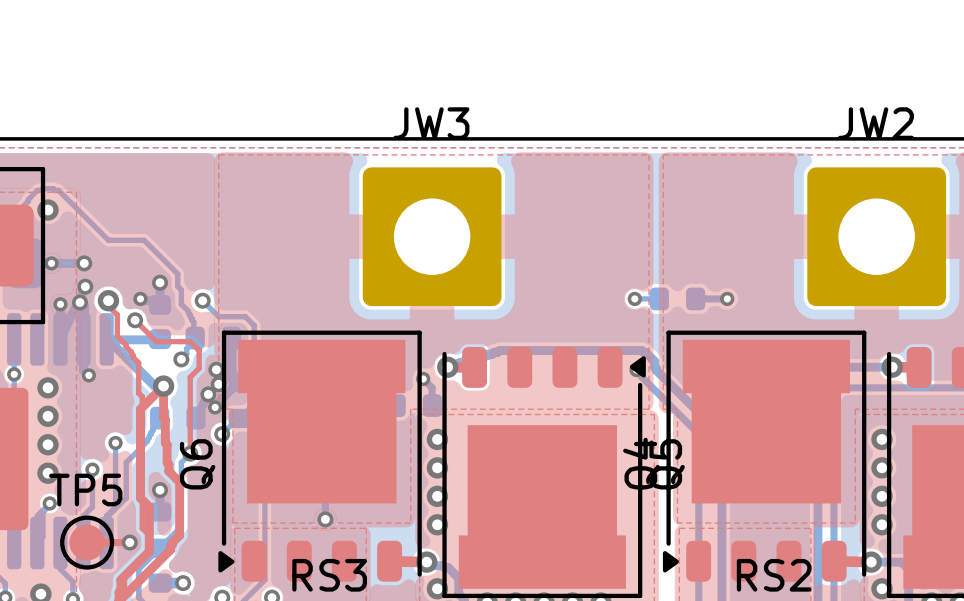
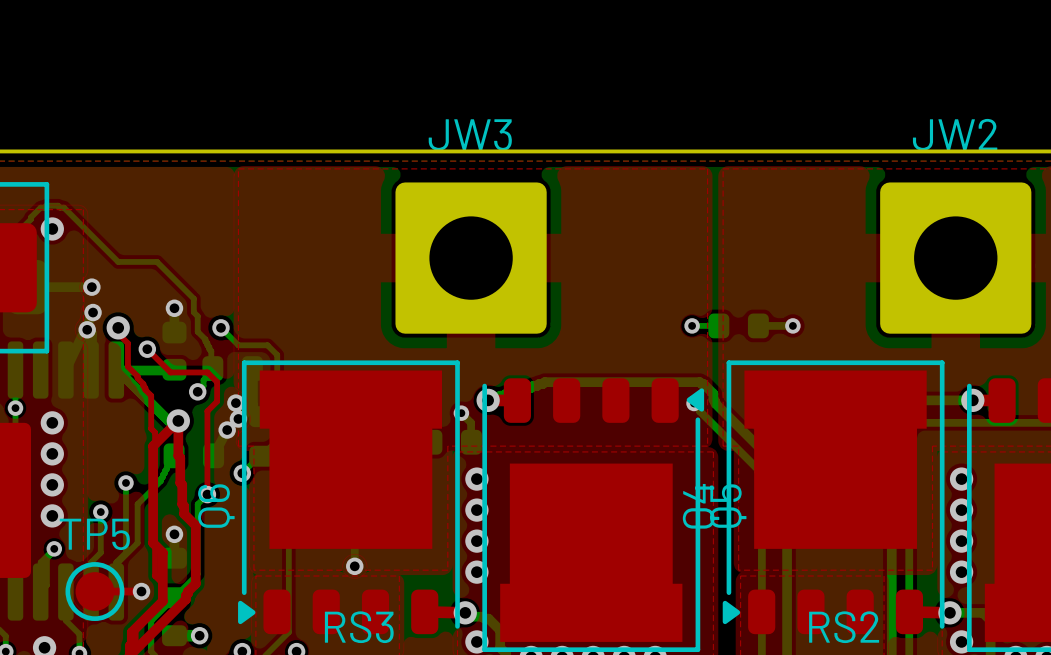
via: (51, 263) -> none
via: (140, 298) -> none
via: (60, 304) -> none
via: (88, 375) -> none
via: (215, 407) -> none

